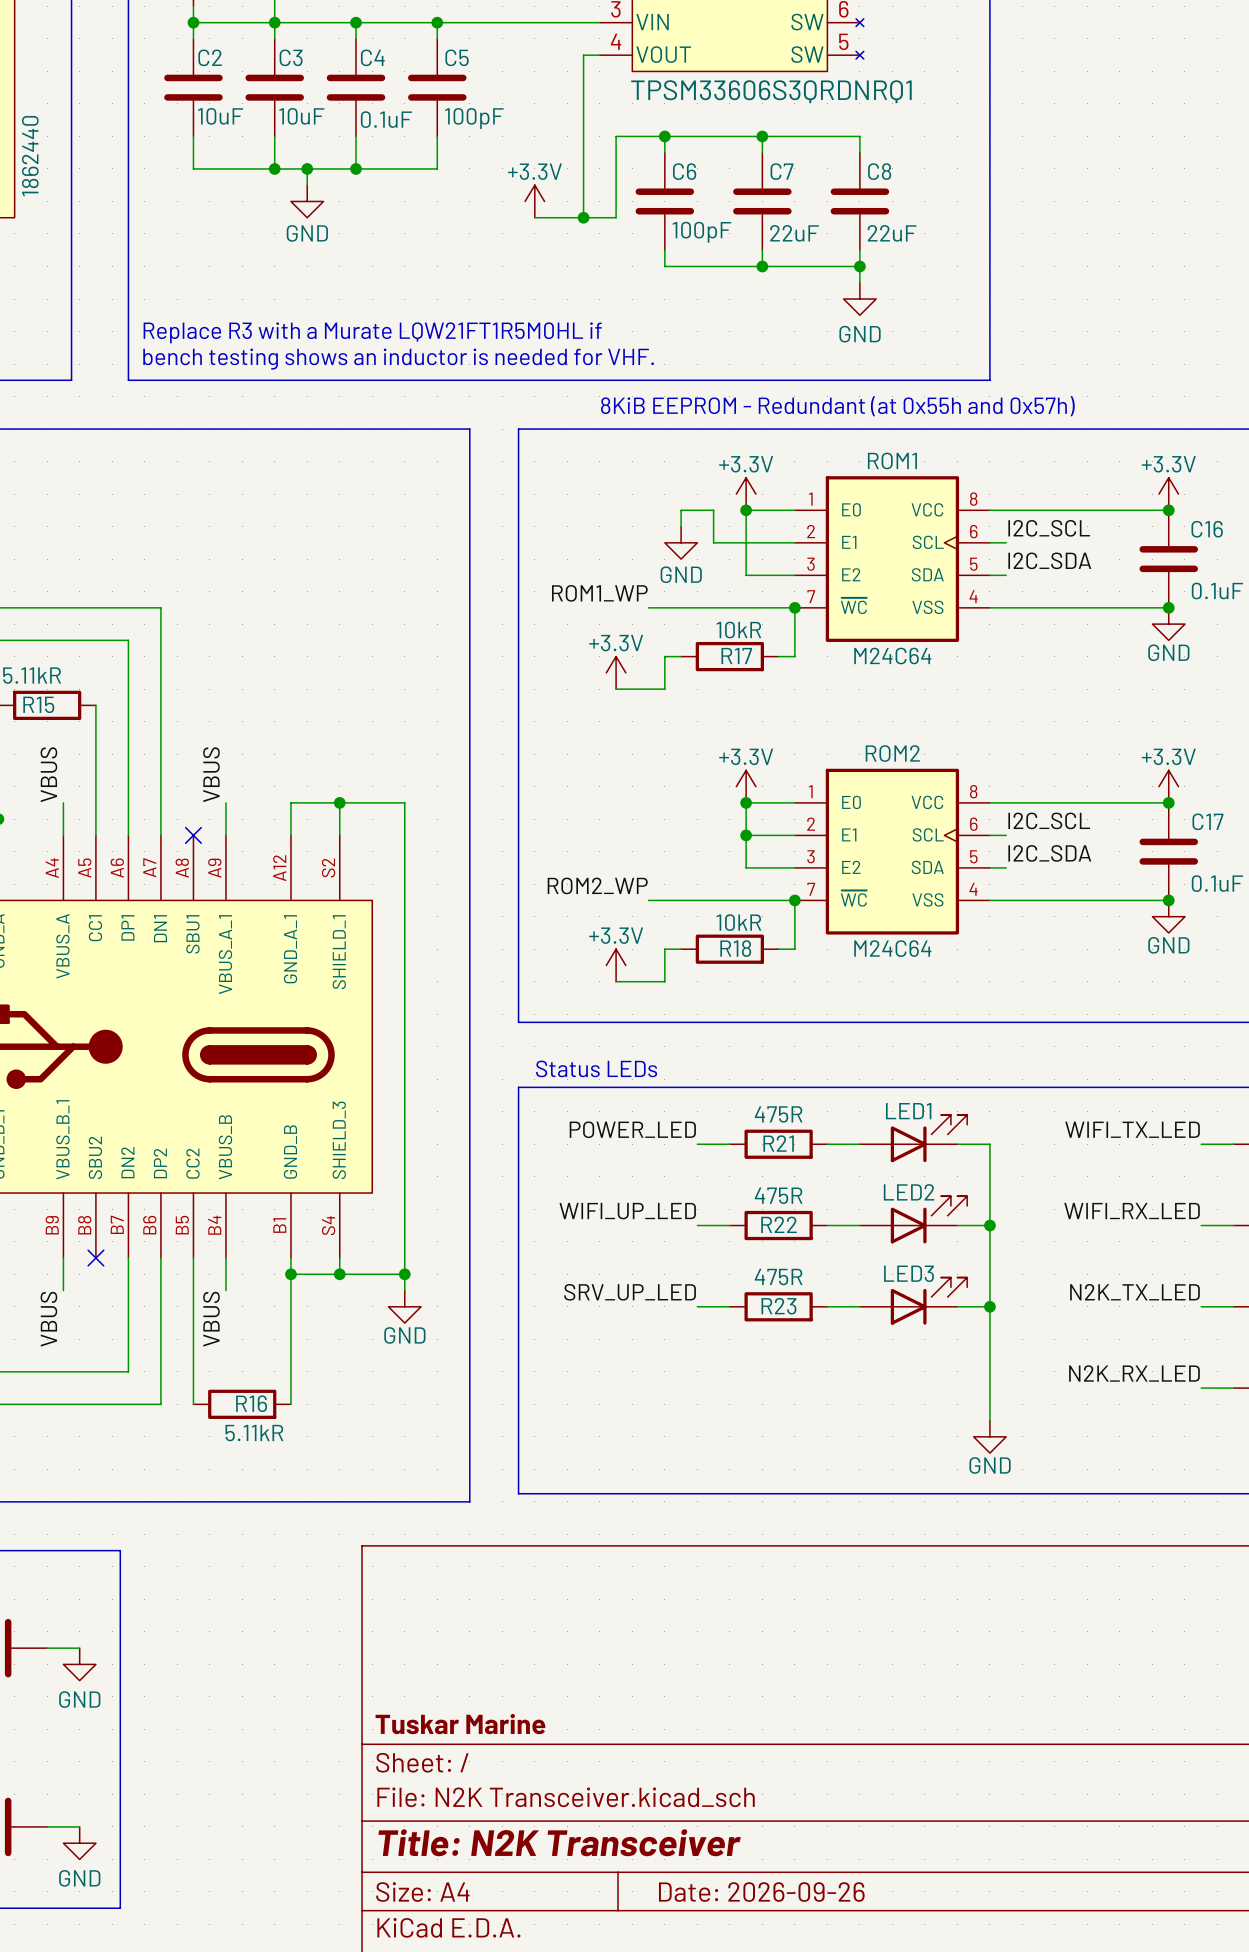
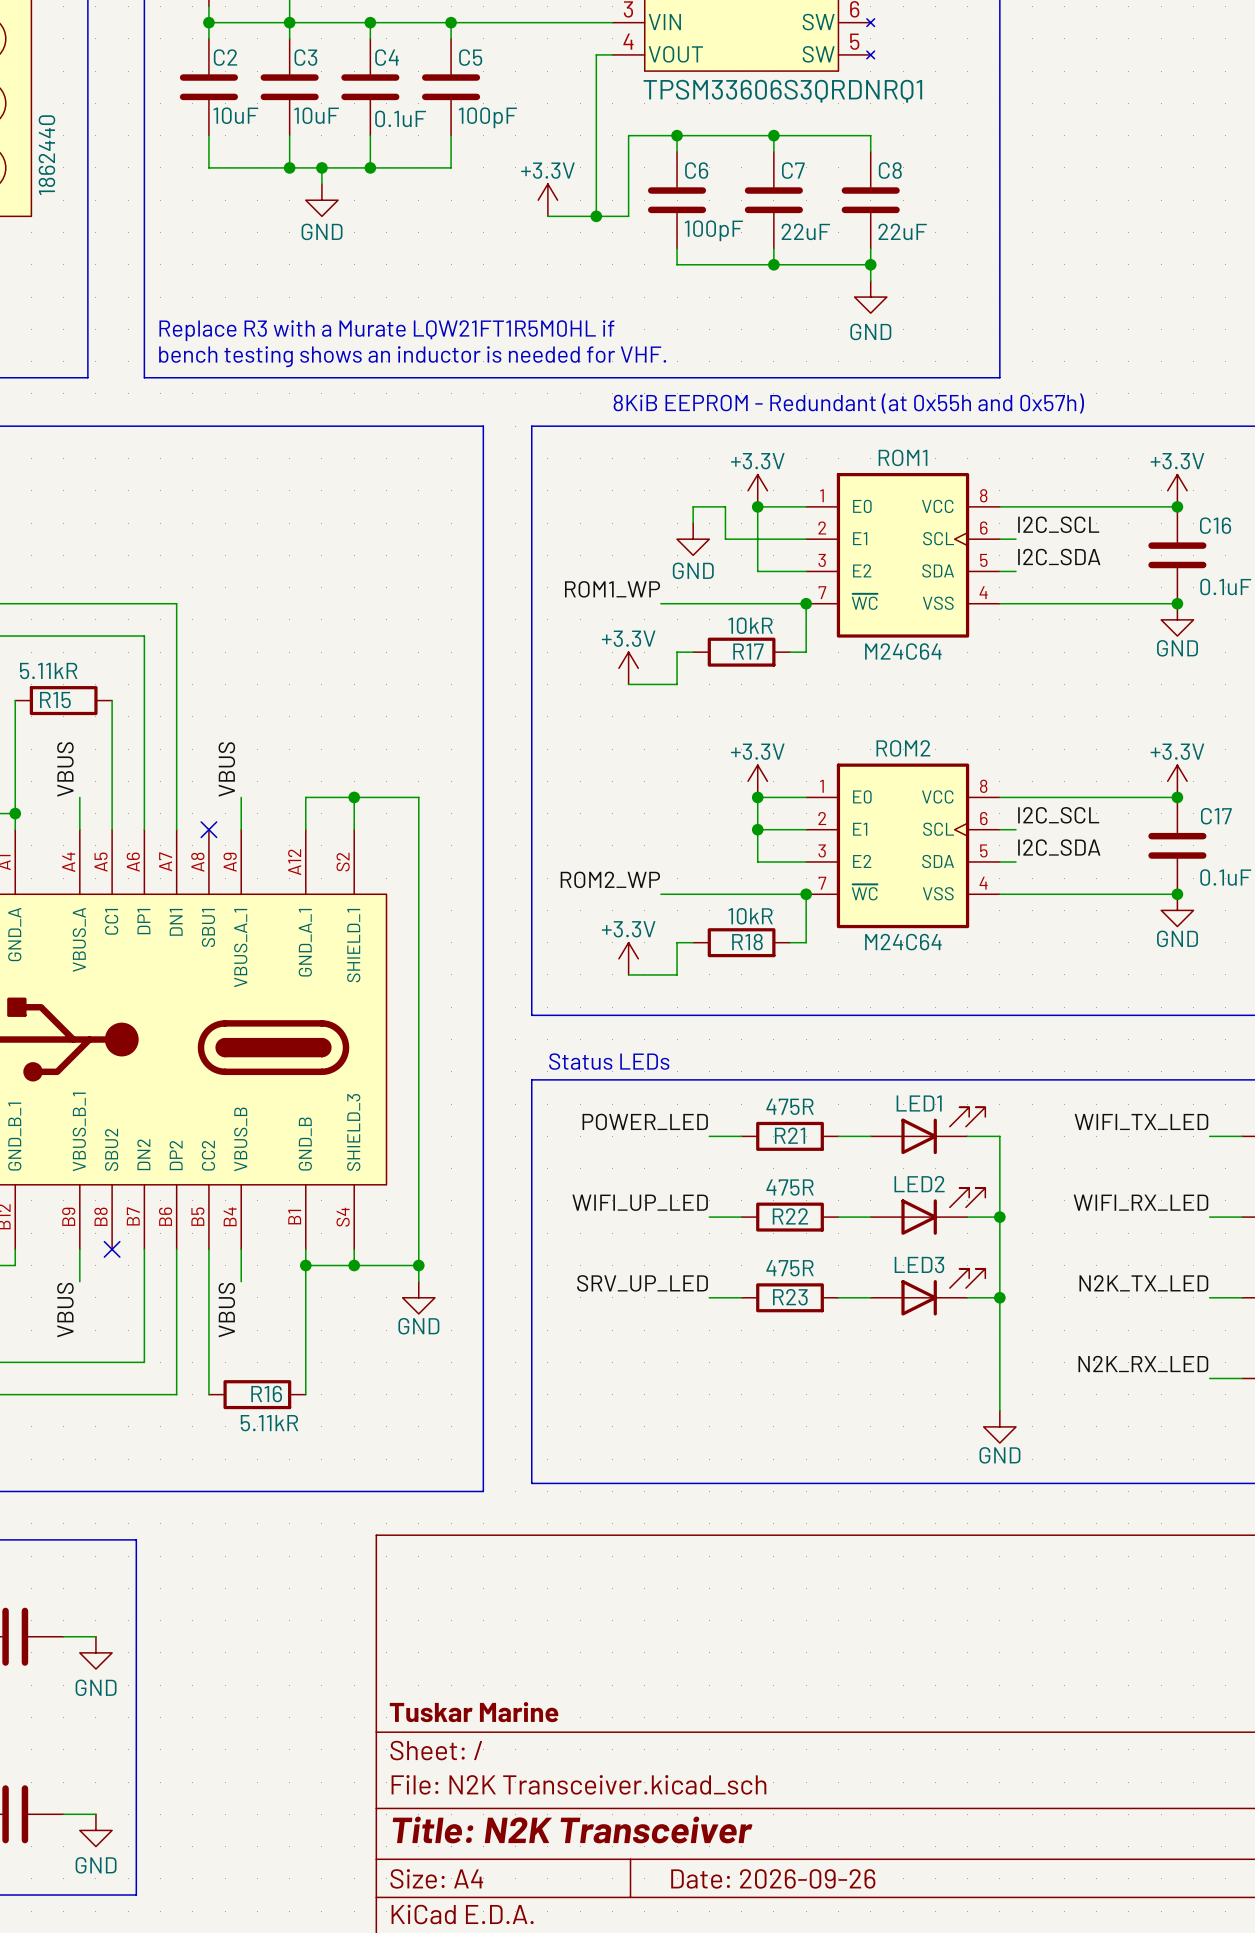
LED1 symbol: [859, 1115, 968, 1163] -> [870, 1107, 986, 1155]
LED2 symbol: [859, 1196, 968, 1244] -> [870, 1188, 986, 1235]
LED3 symbol: [859, 1277, 968, 1325] -> [870, 1268, 986, 1316]

